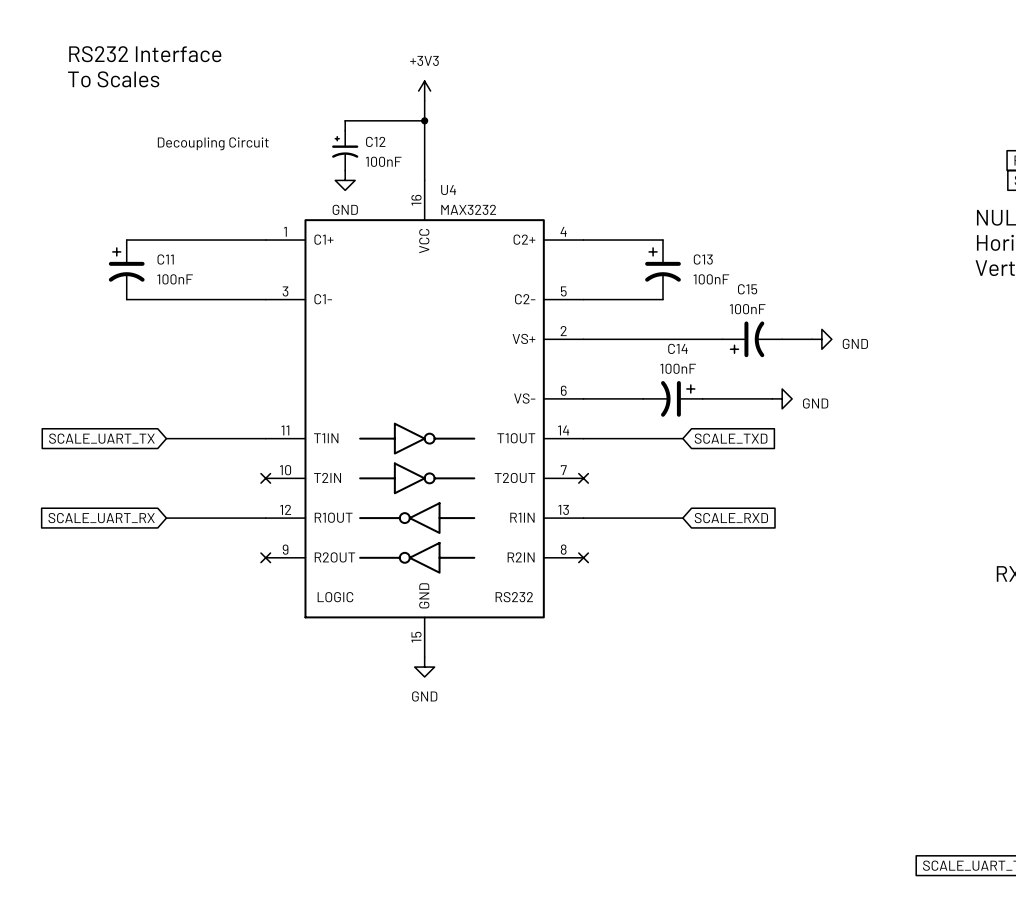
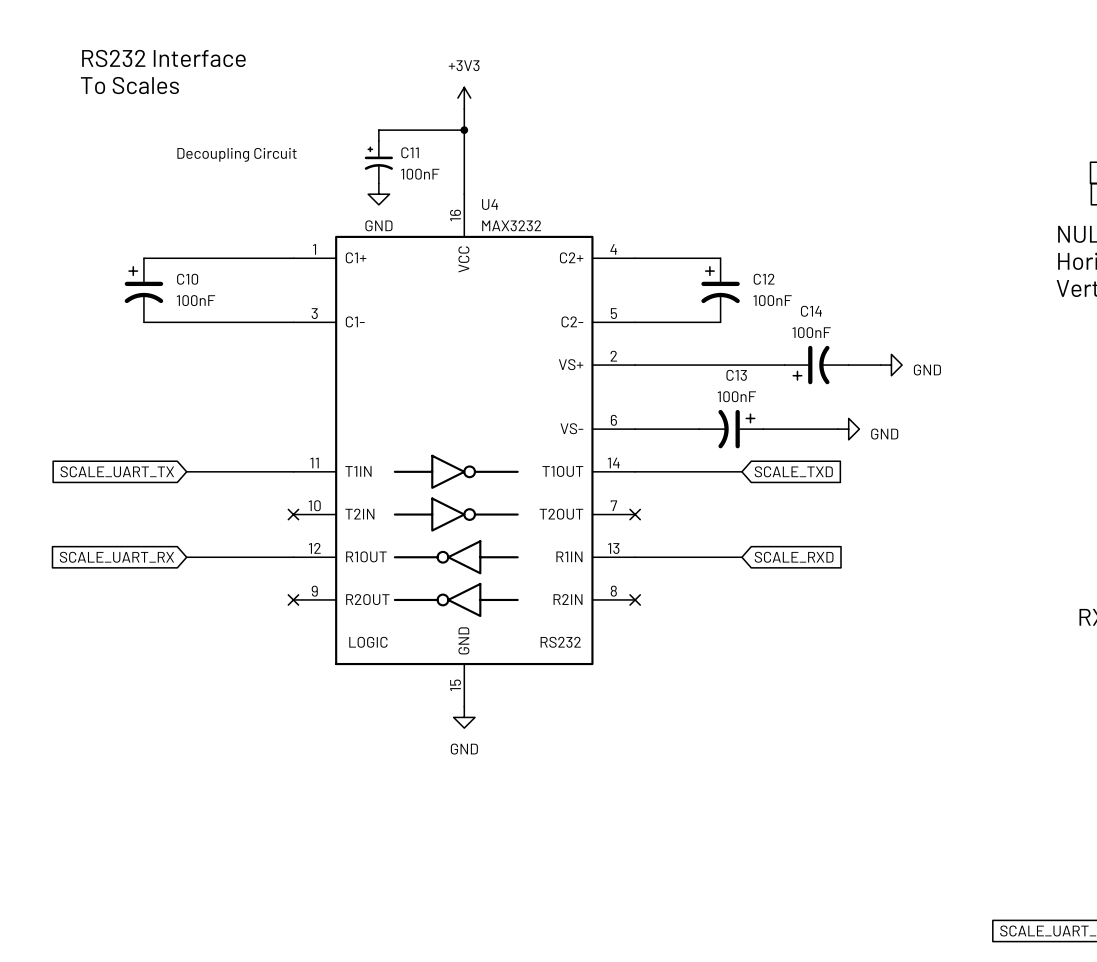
C12 name: C12 (375, 141) -> C11 (410, 152)
C11 name: C11 (165, 259) -> C10 (187, 279)
C13 name: C13 (703, 259) -> C12 (764, 279)
C15 name: C15 (747, 289) -> C14 (811, 311)
C14 name: C14 (677, 348) -> C13 (736, 375)

